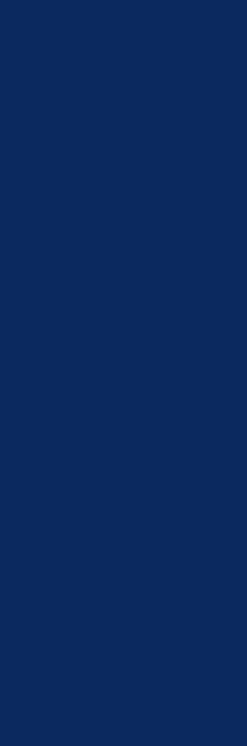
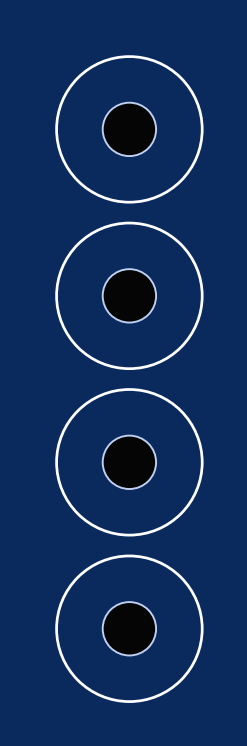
part: none -> (129, 129)
part: none -> (129, 295)
part: none -> (129, 462)
part: none -> (129, 628)

